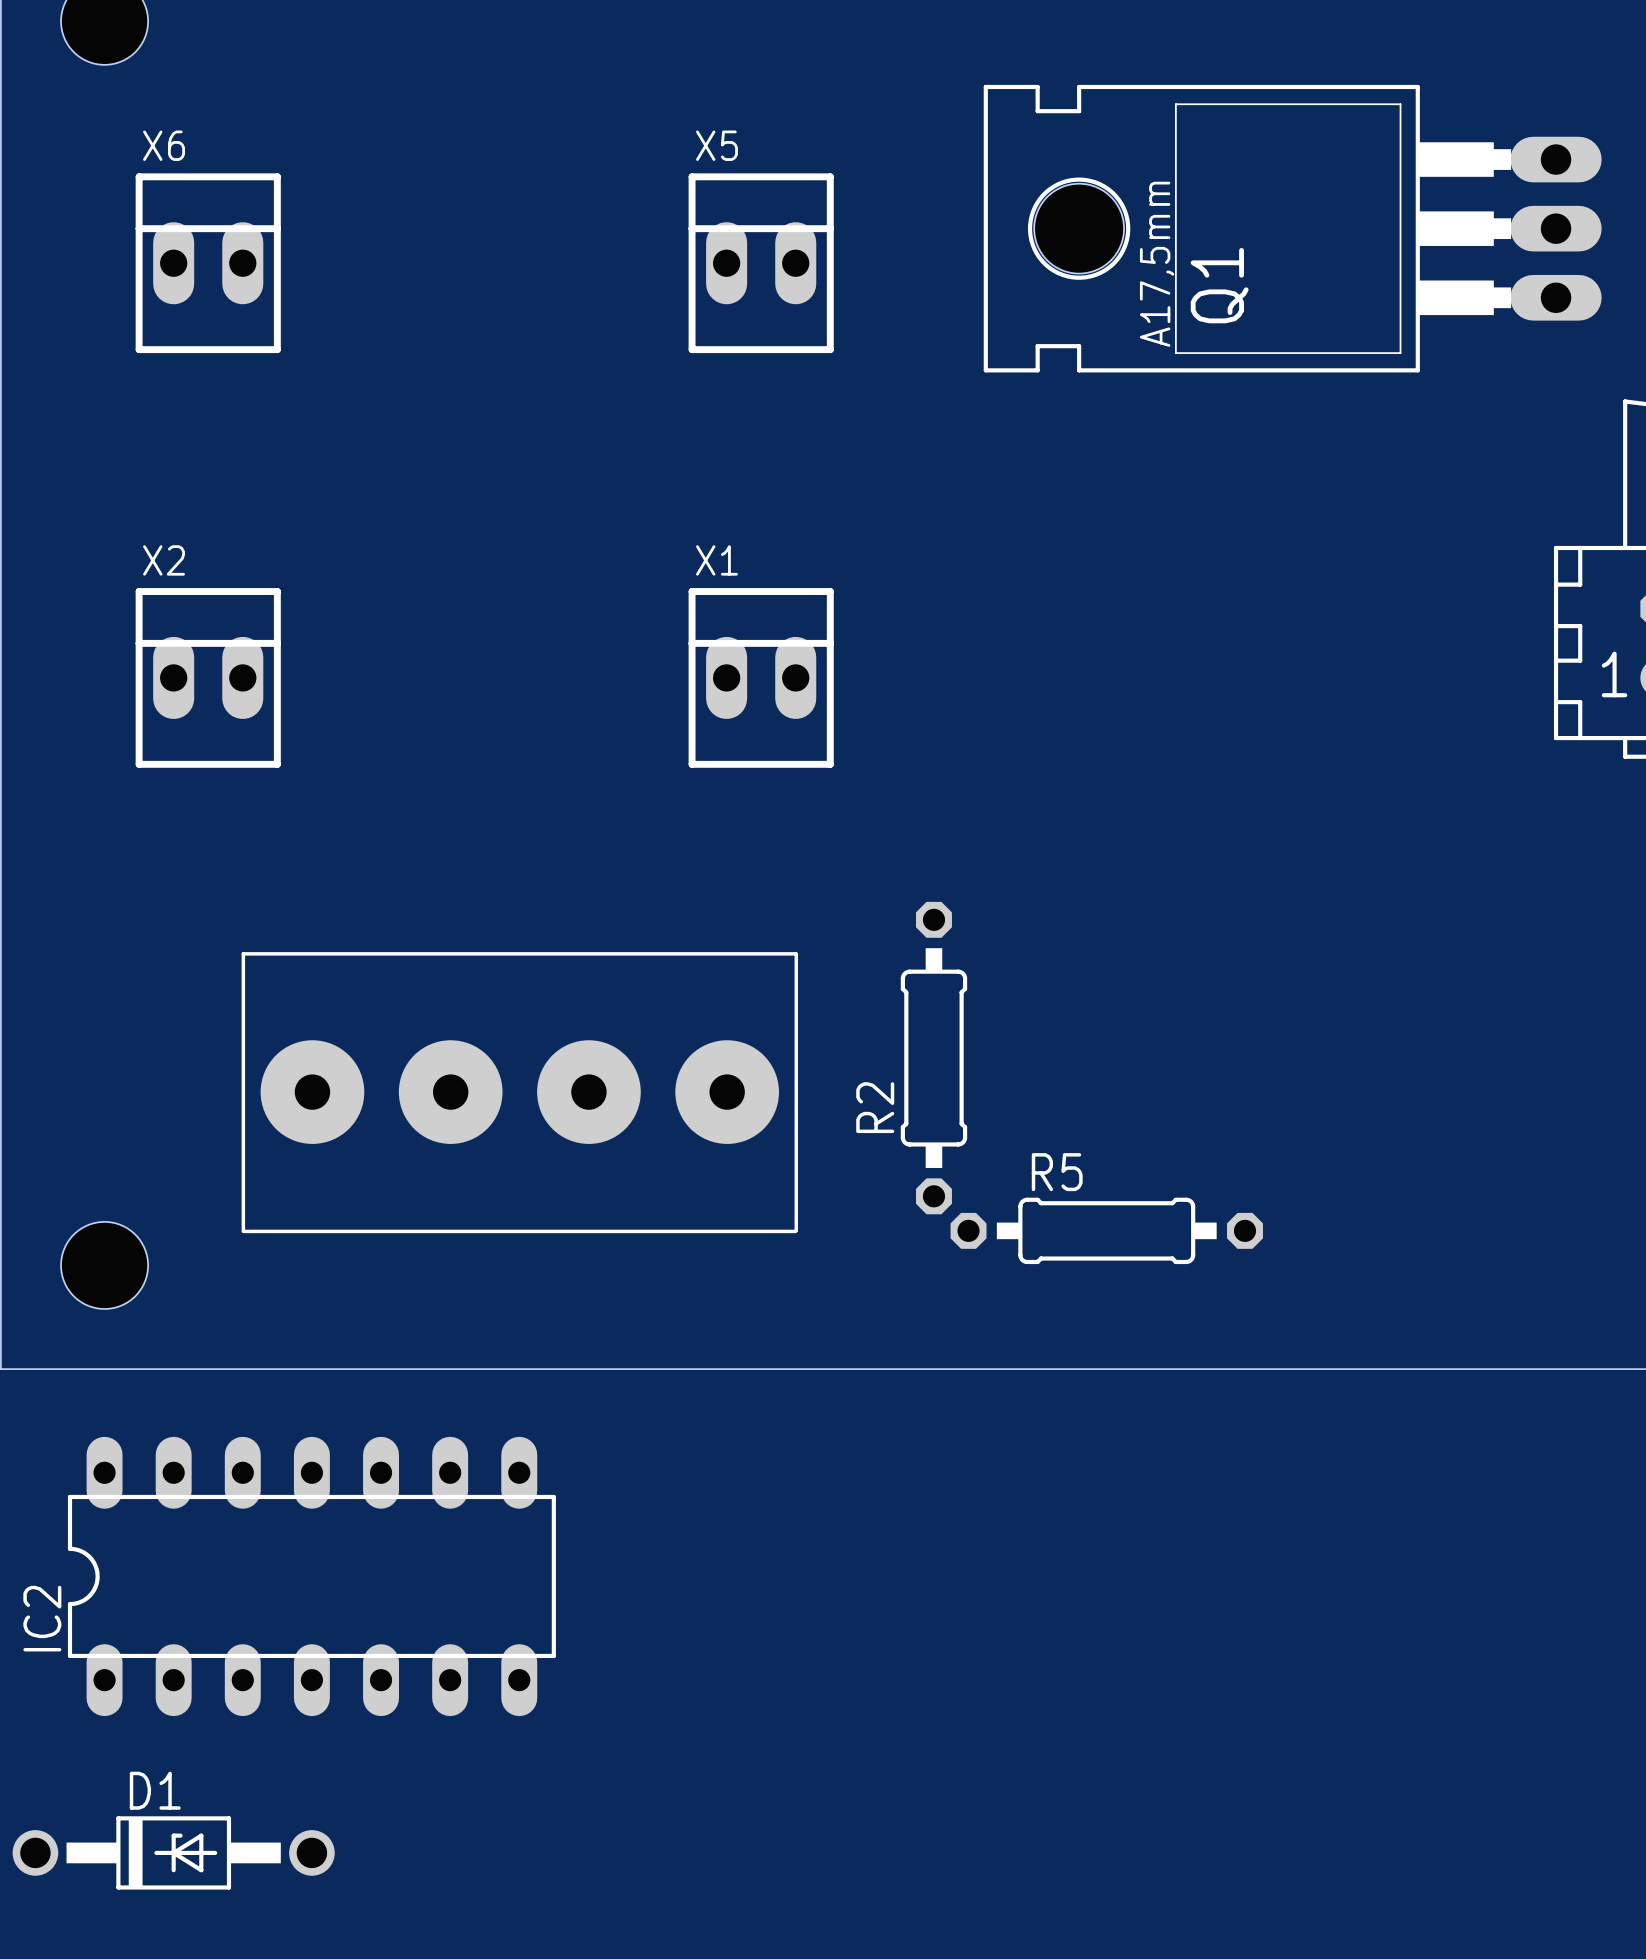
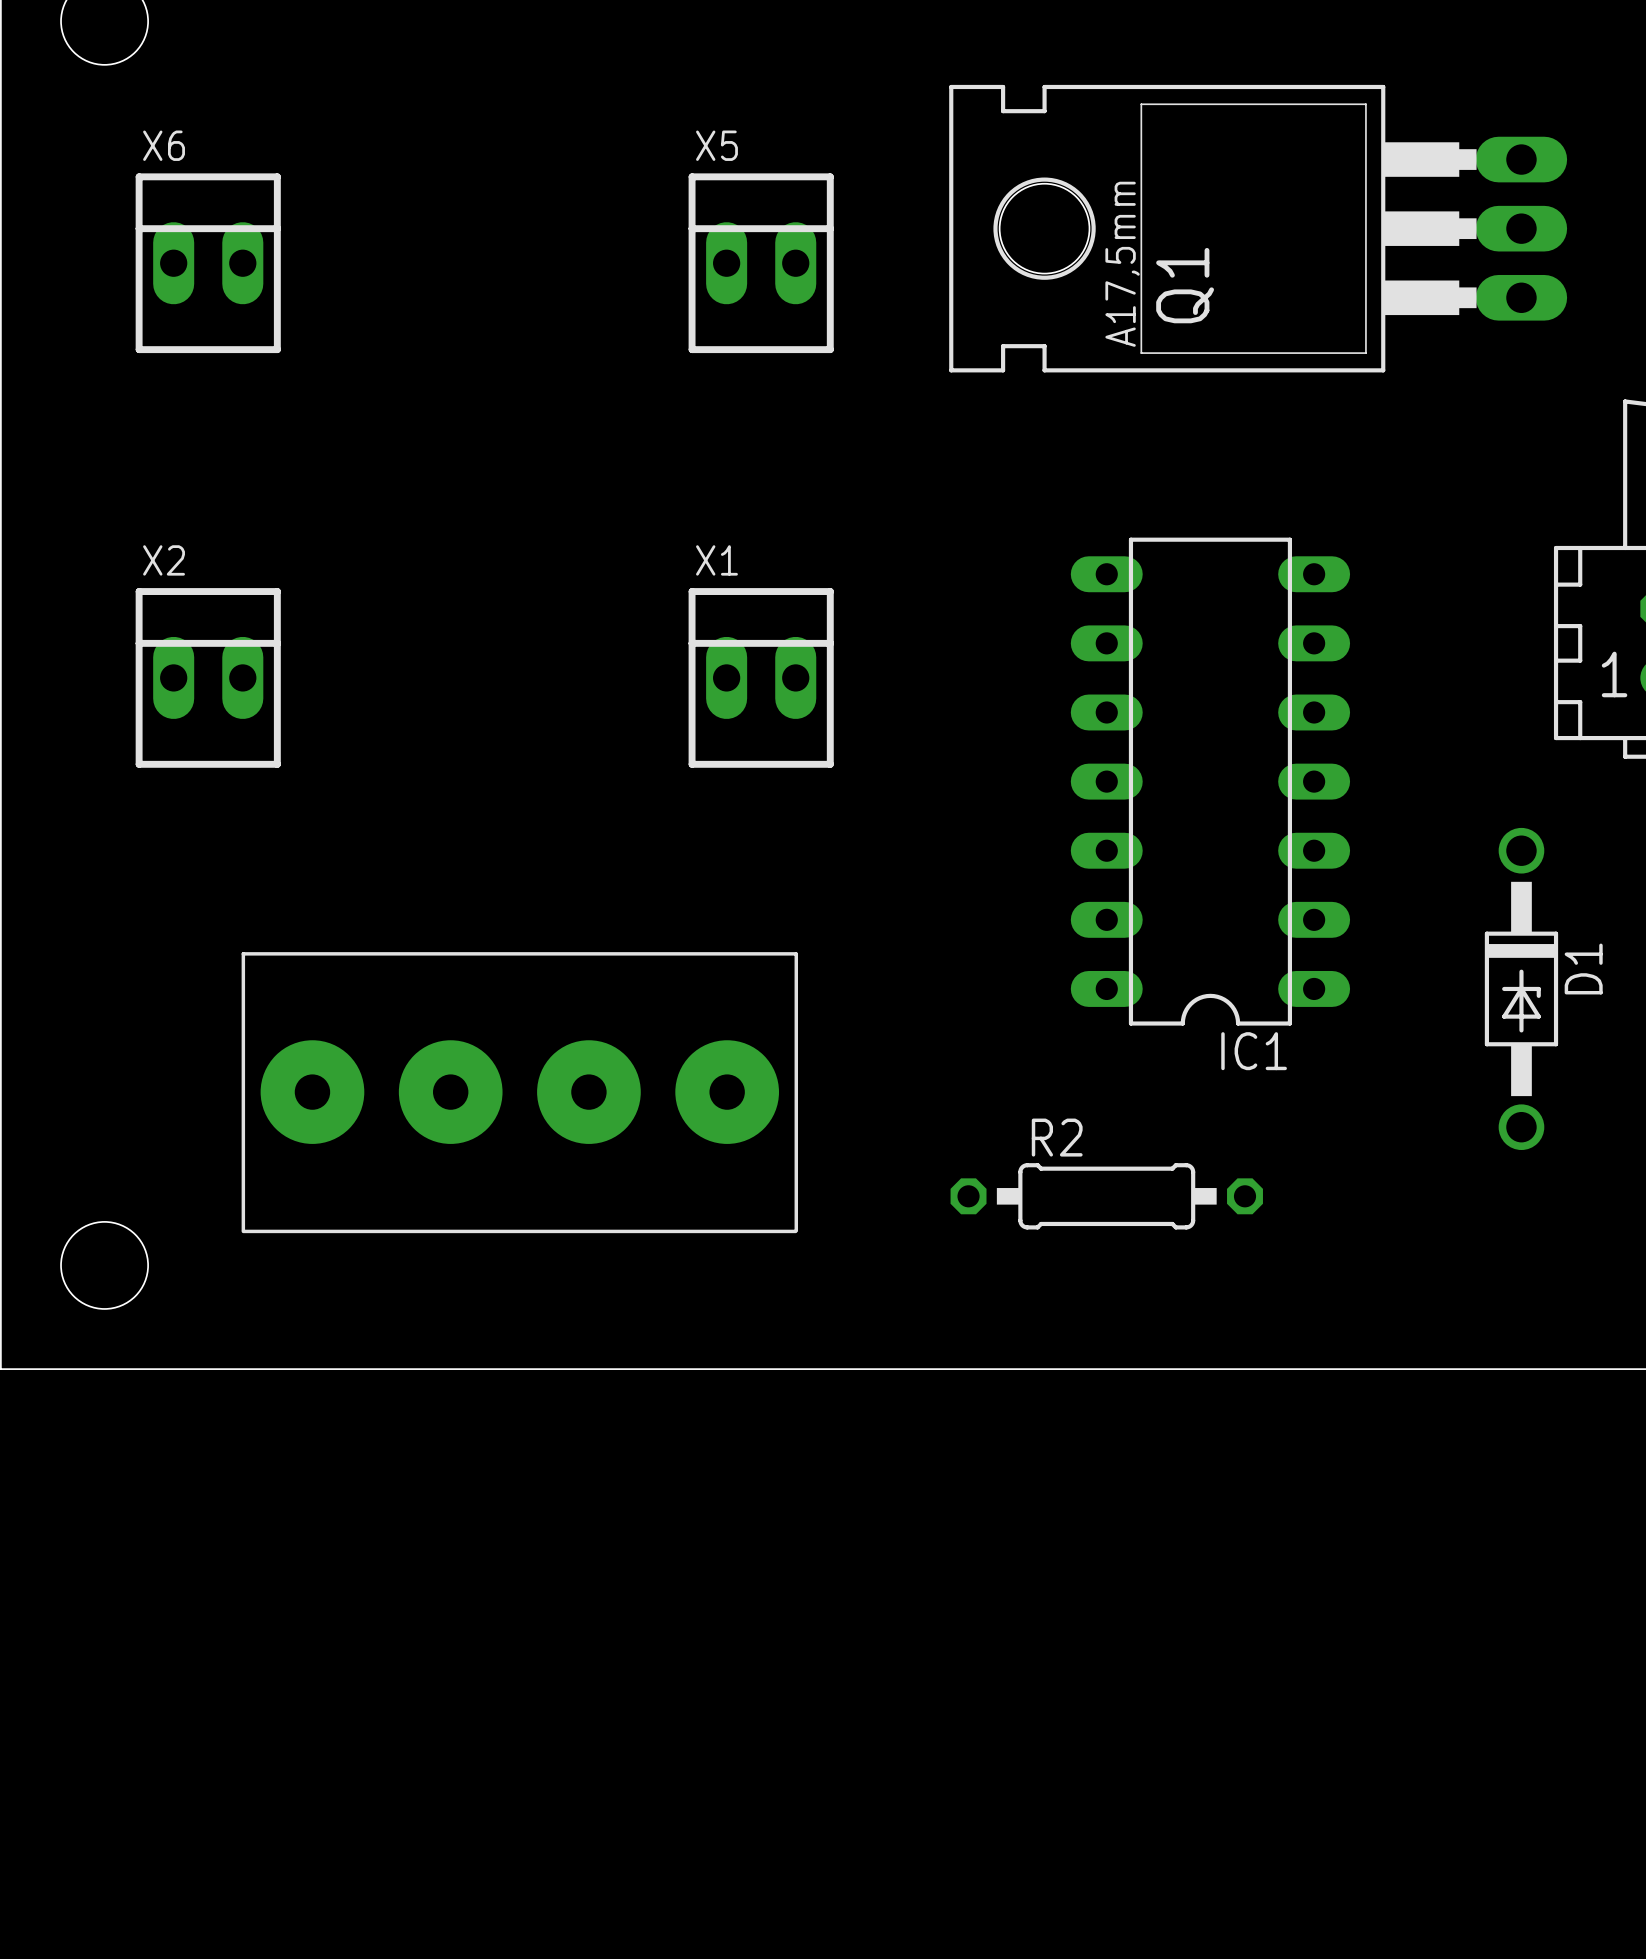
Q1 position: (1292, 228) -> (1258, 228)
IC1: none -> (1210, 781)
R2 rotation: 0° (933, 1058) -> 90° clockwise (1106, 1196)
R2 position: (933, 1058) -> (1106, 1196)
R5: (1106, 1230) -> none
IC2: (311, 1576) -> none
D1 rotation: 0° (173, 1852) -> 90° clockwise (1521, 988)
D1 position: (173, 1852) -> (1521, 988)

